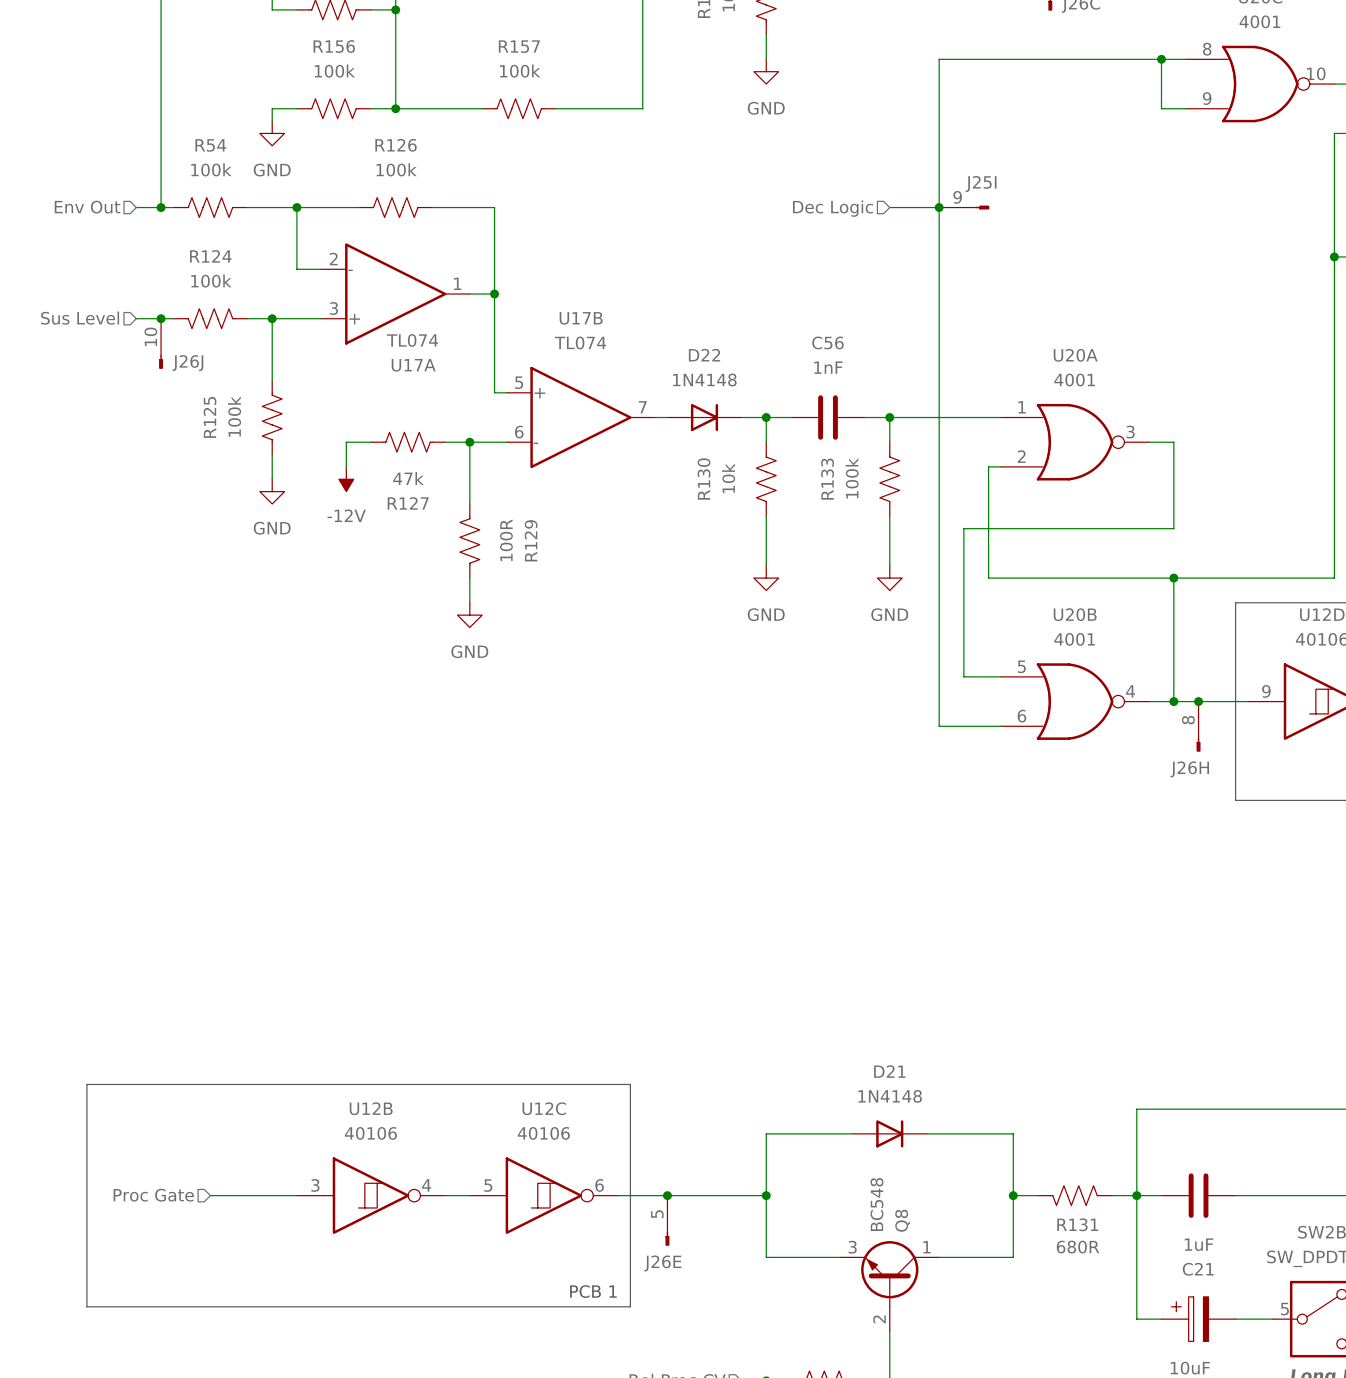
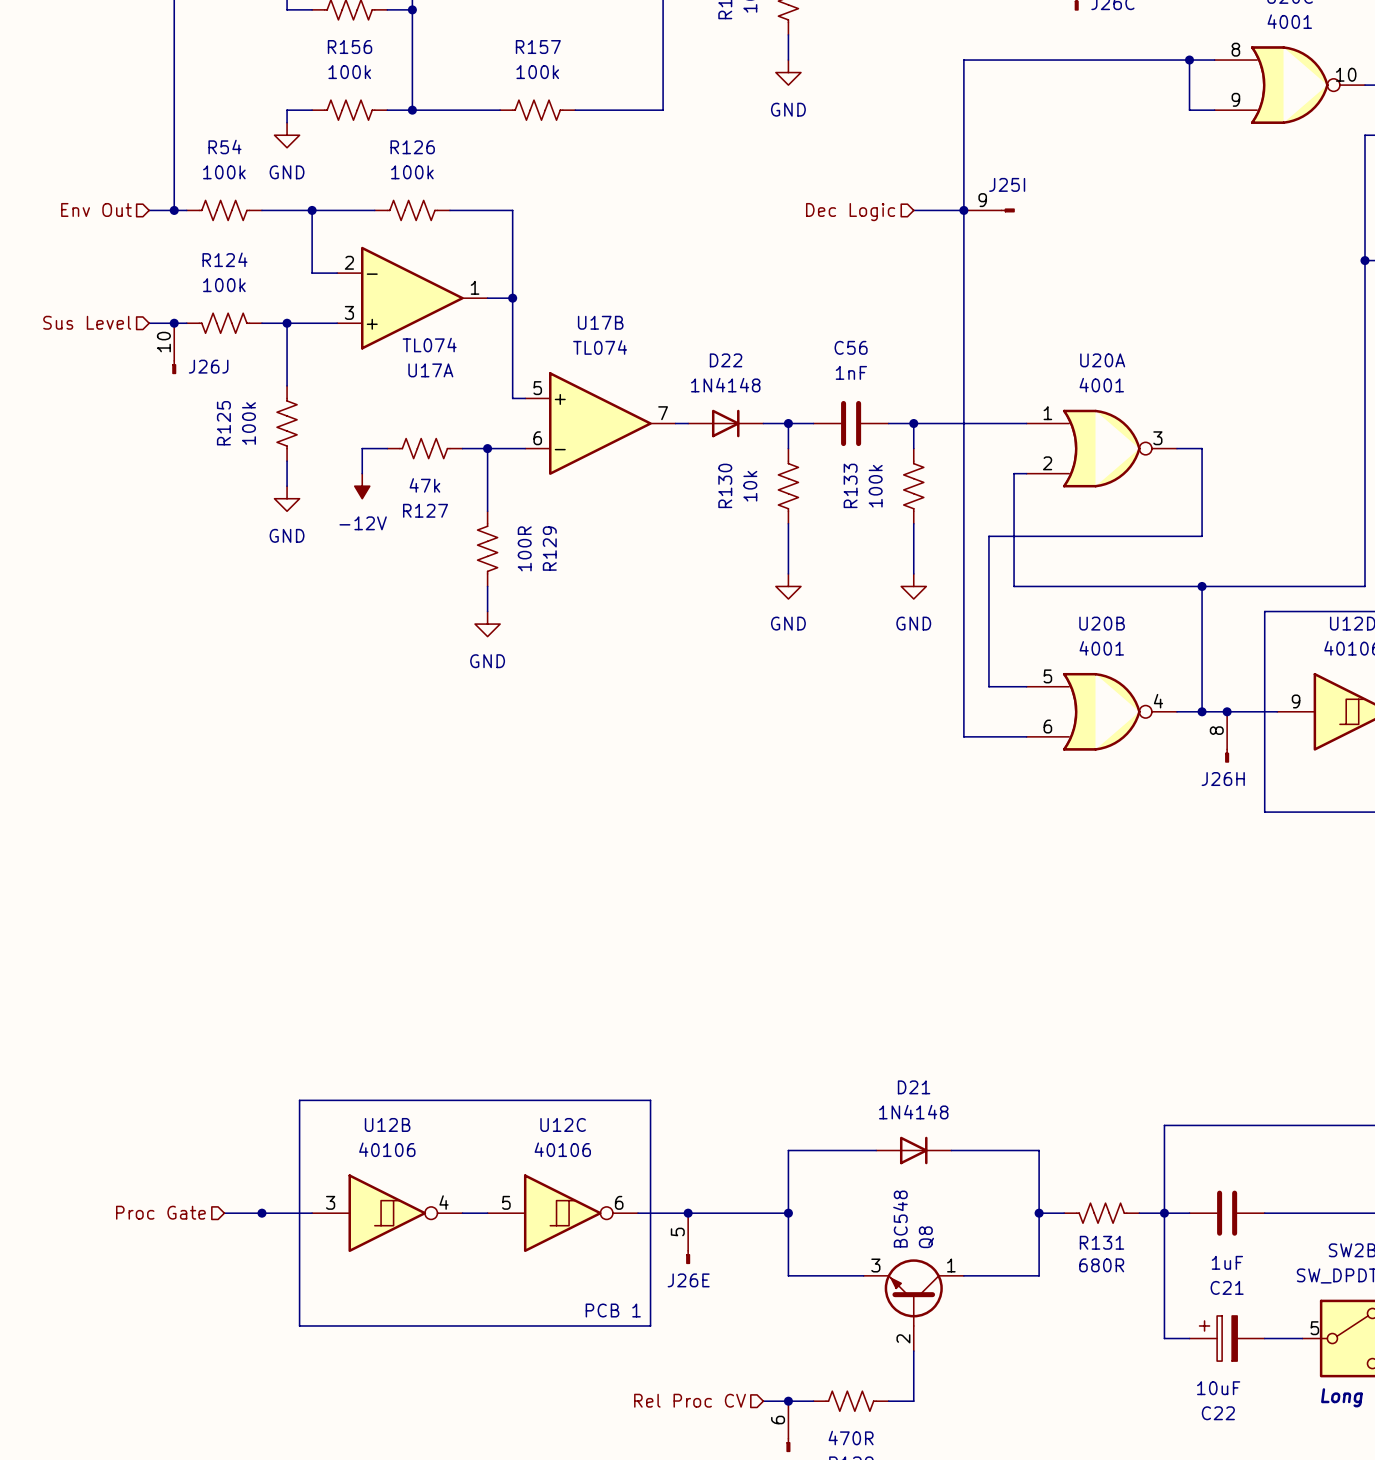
line: (284, 1084) (86, 1084) (86, 1306) (284, 1306) -> (299, 1100) (299, 1325)
junction: none -> (261, 1213)

